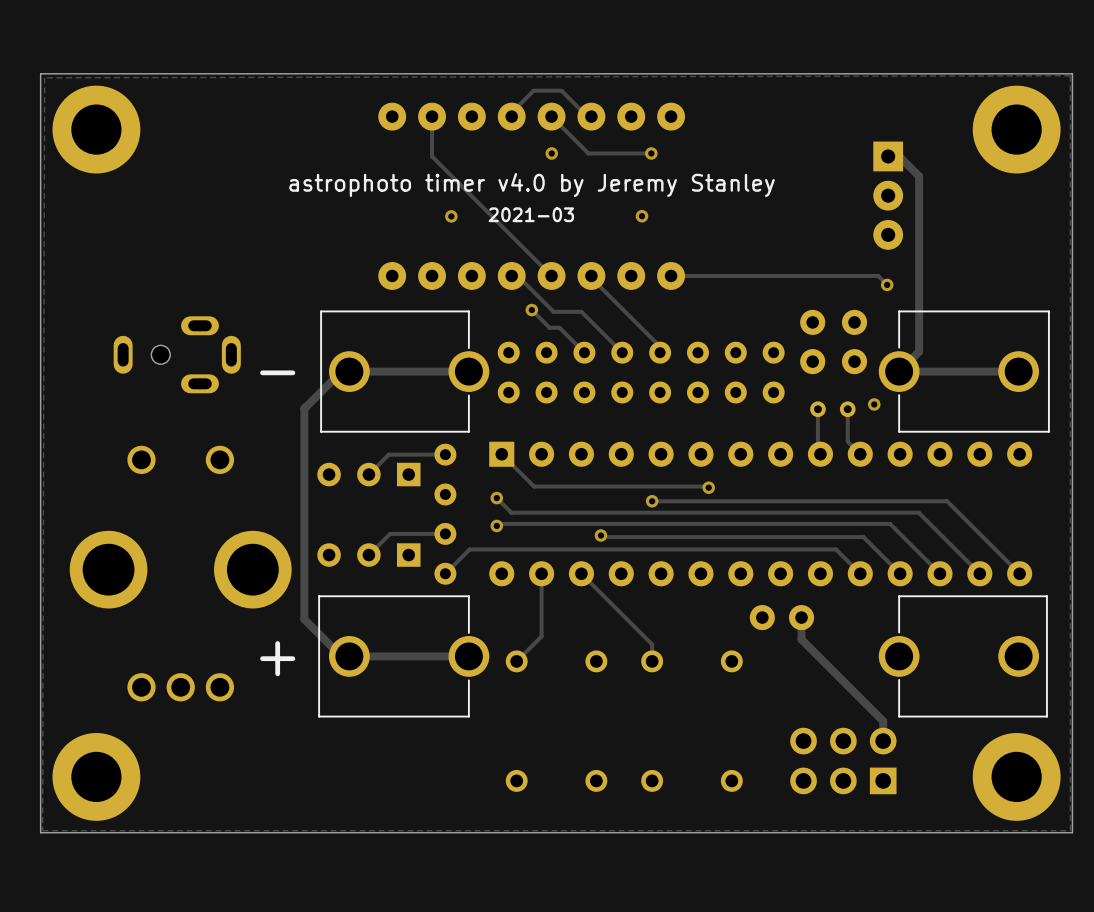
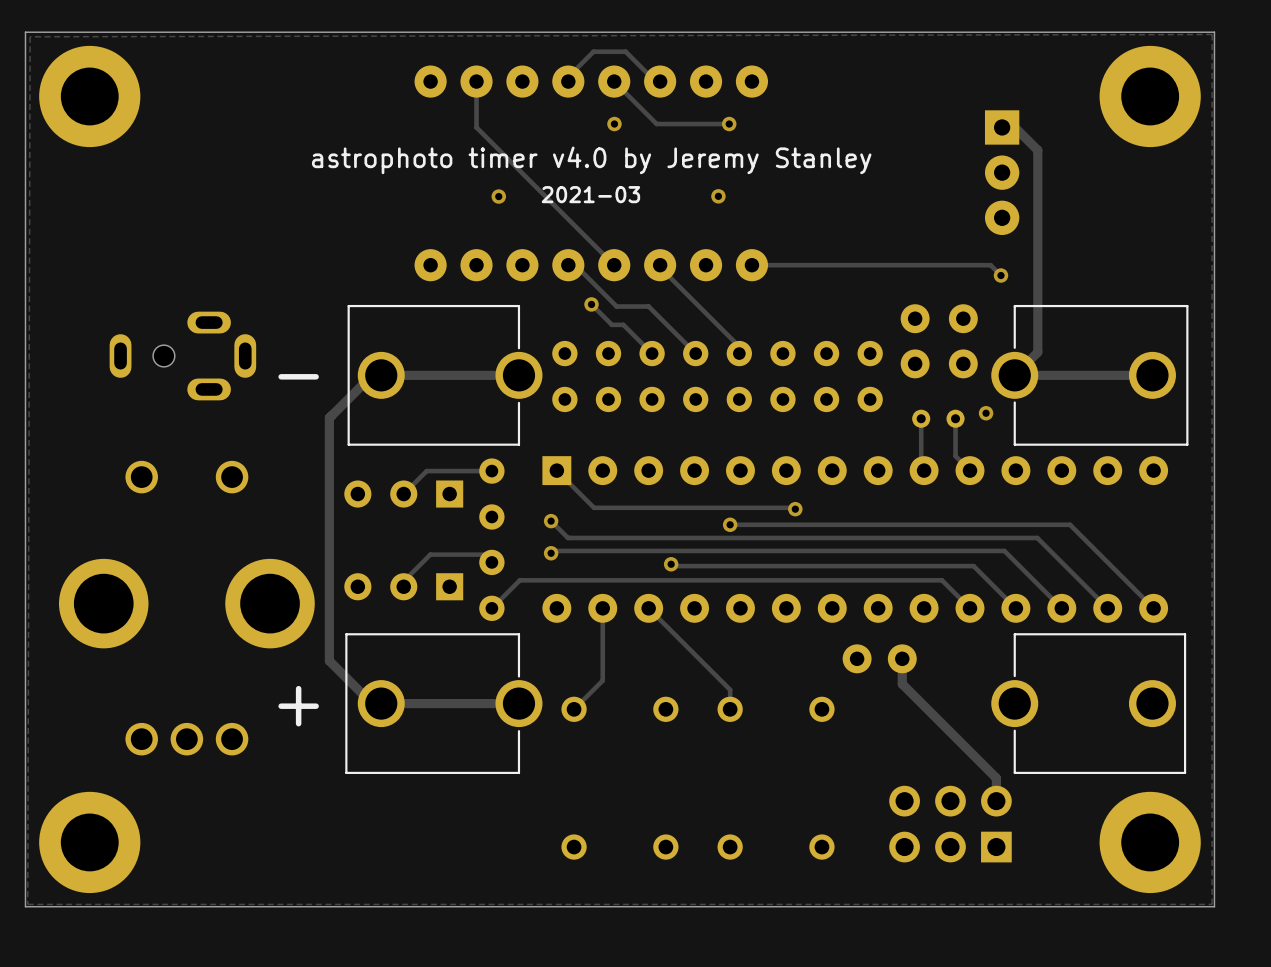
track: (445, 533) (390, 533) (368, 555) -> none
track: none -> (496, 561) (489, 554) (430, 554) (408, 576) (408, 586)

